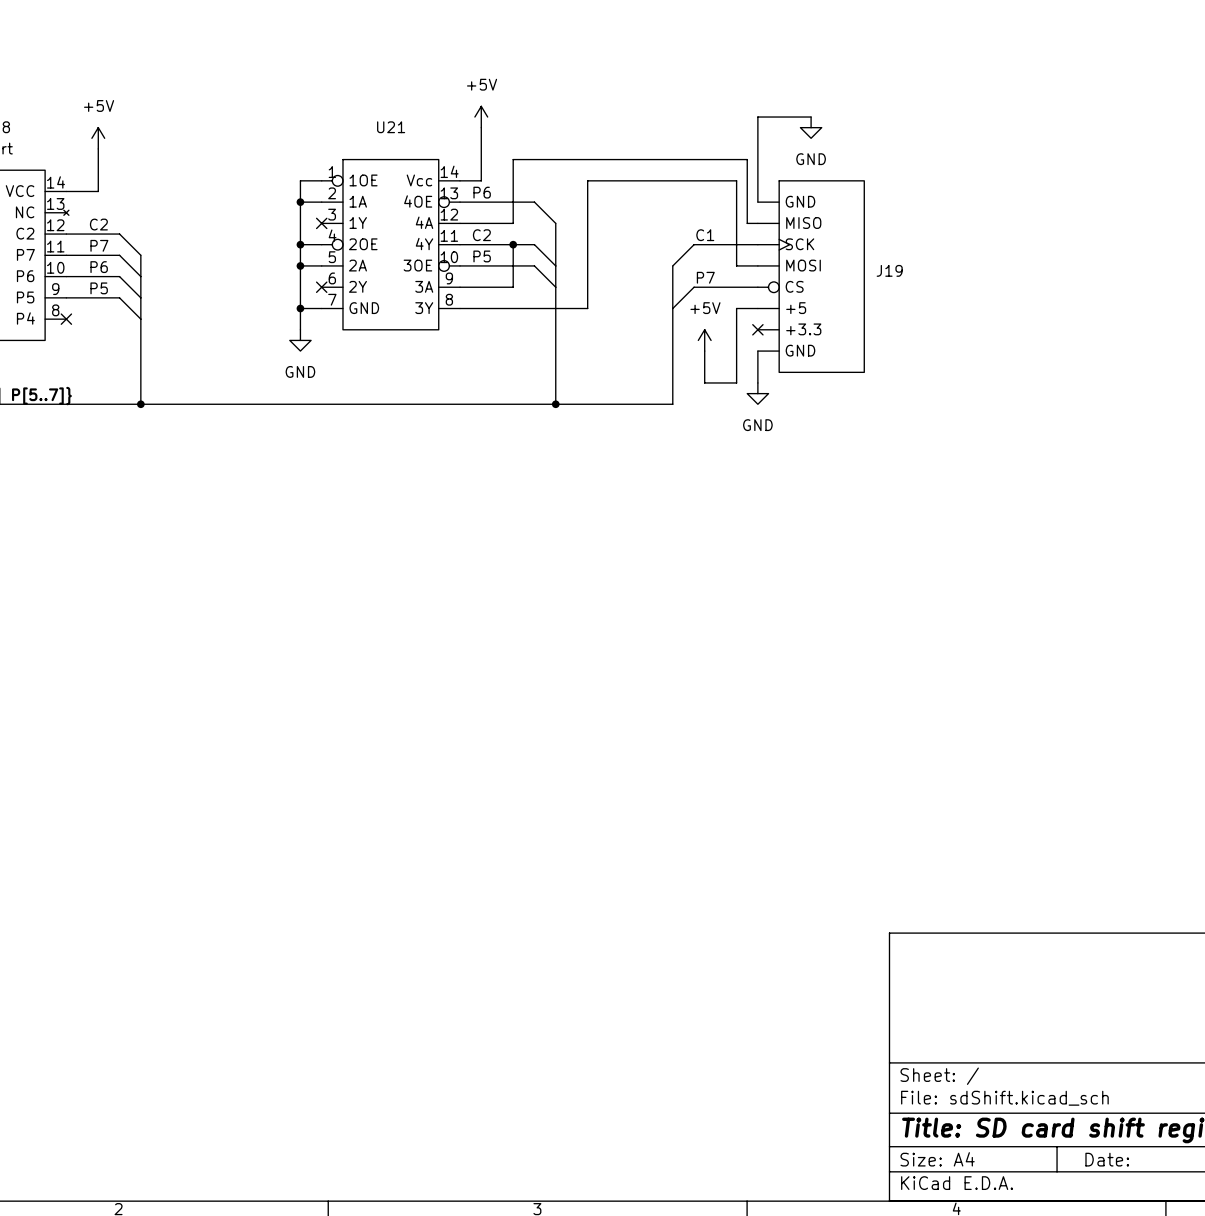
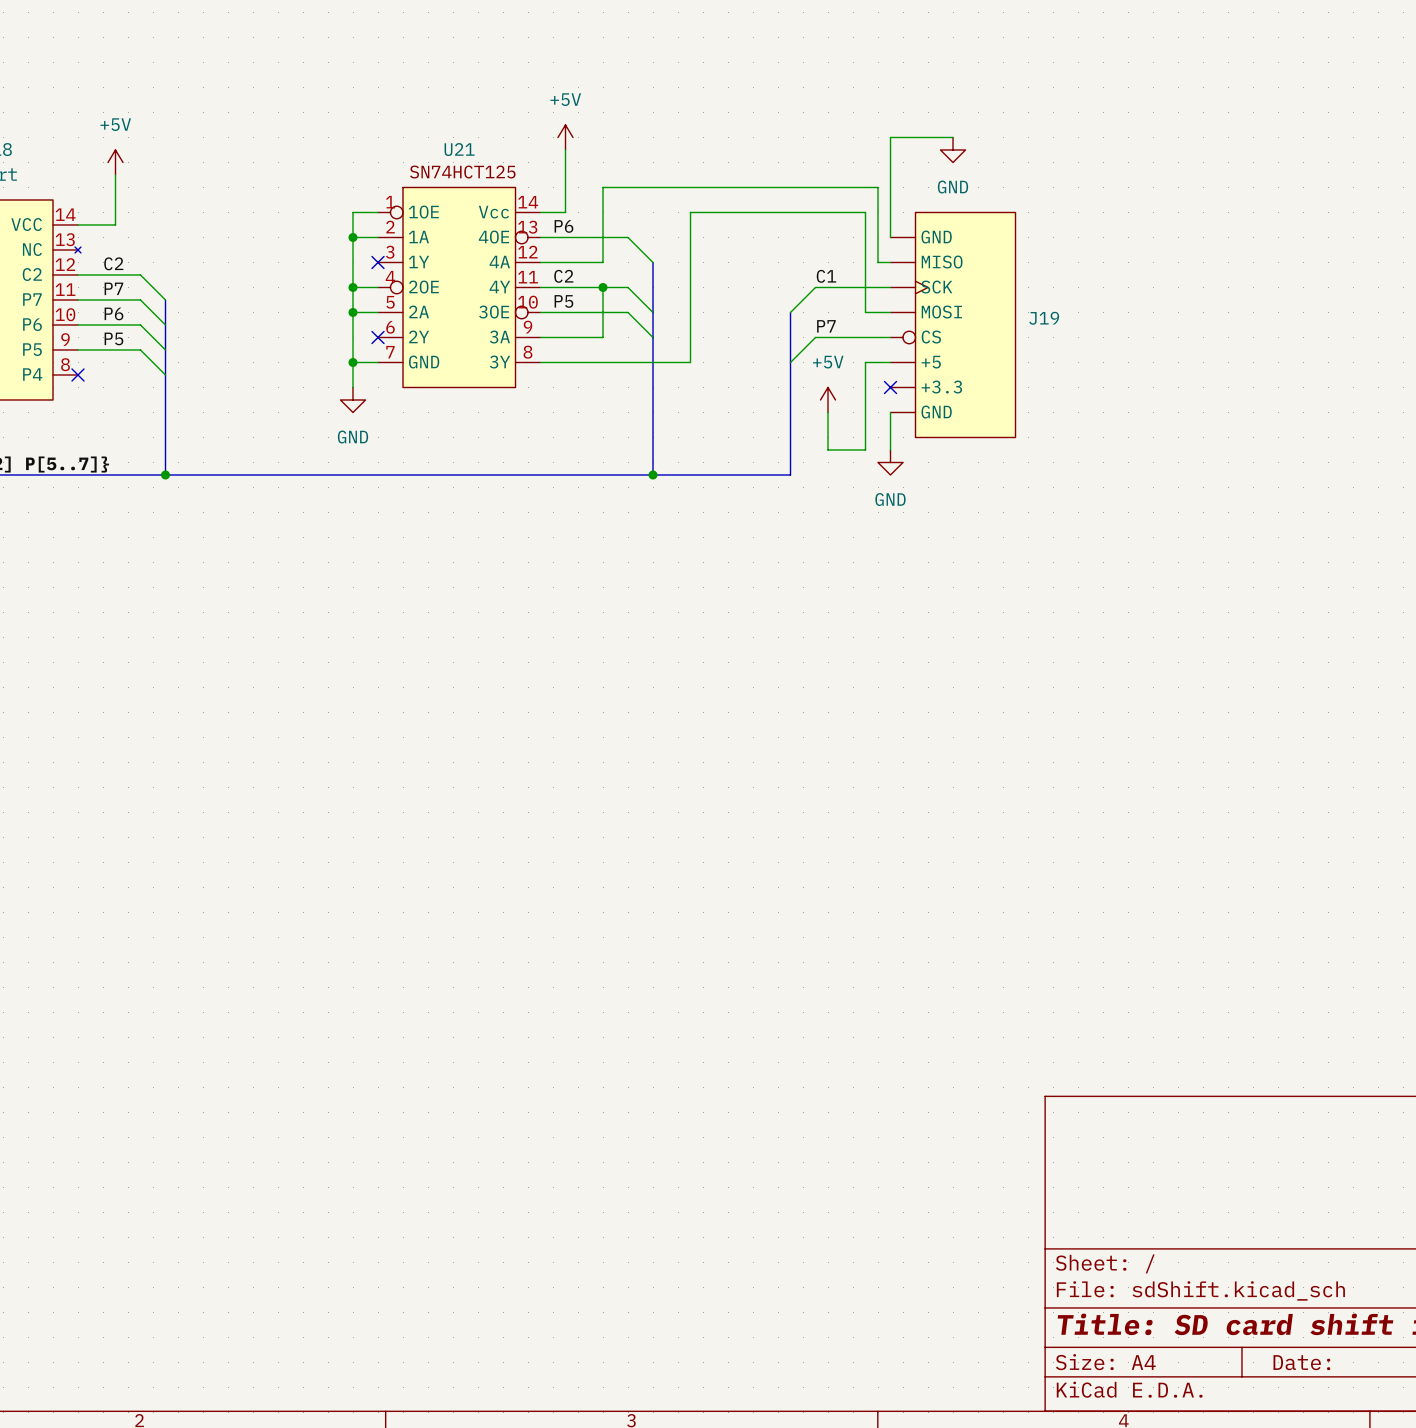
U21 text: none -> SN74HCT125 (462, 172)

